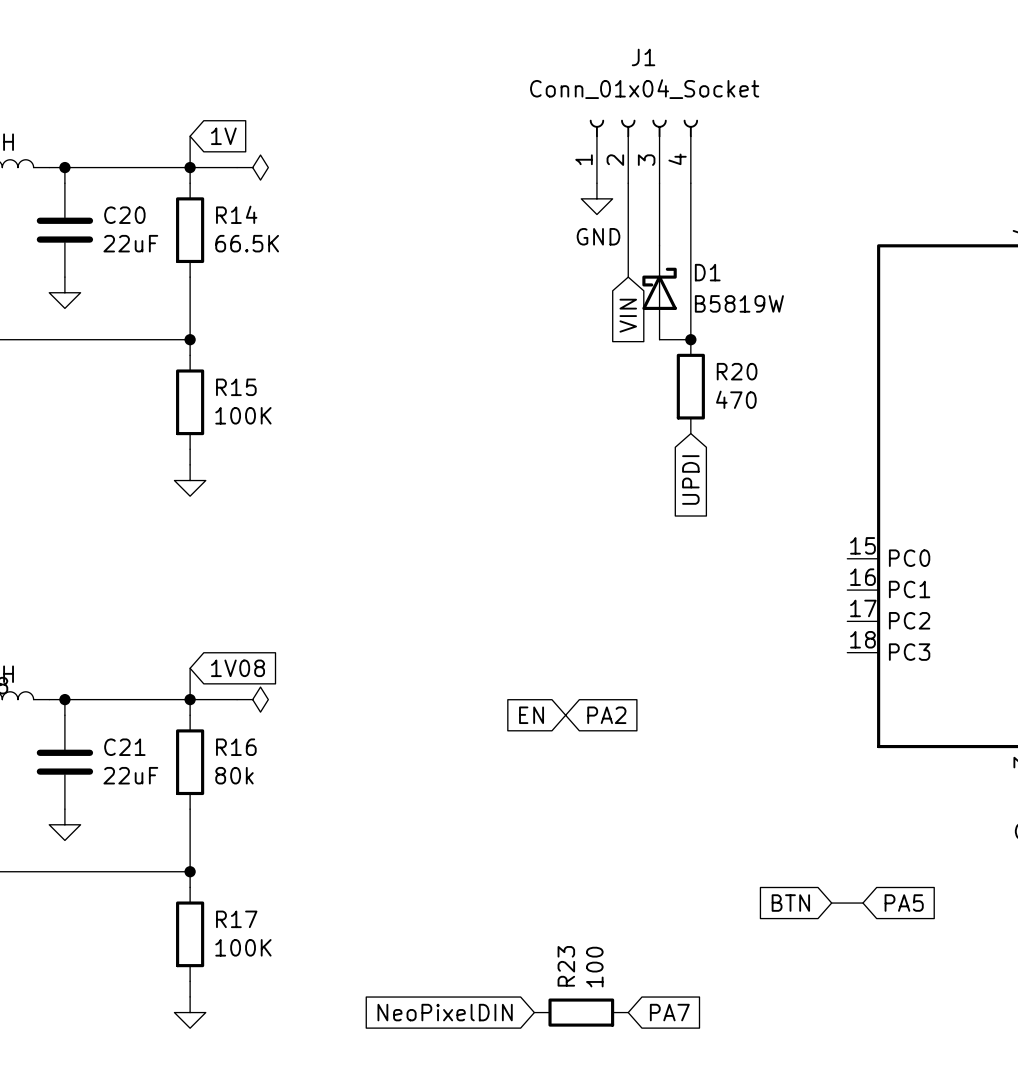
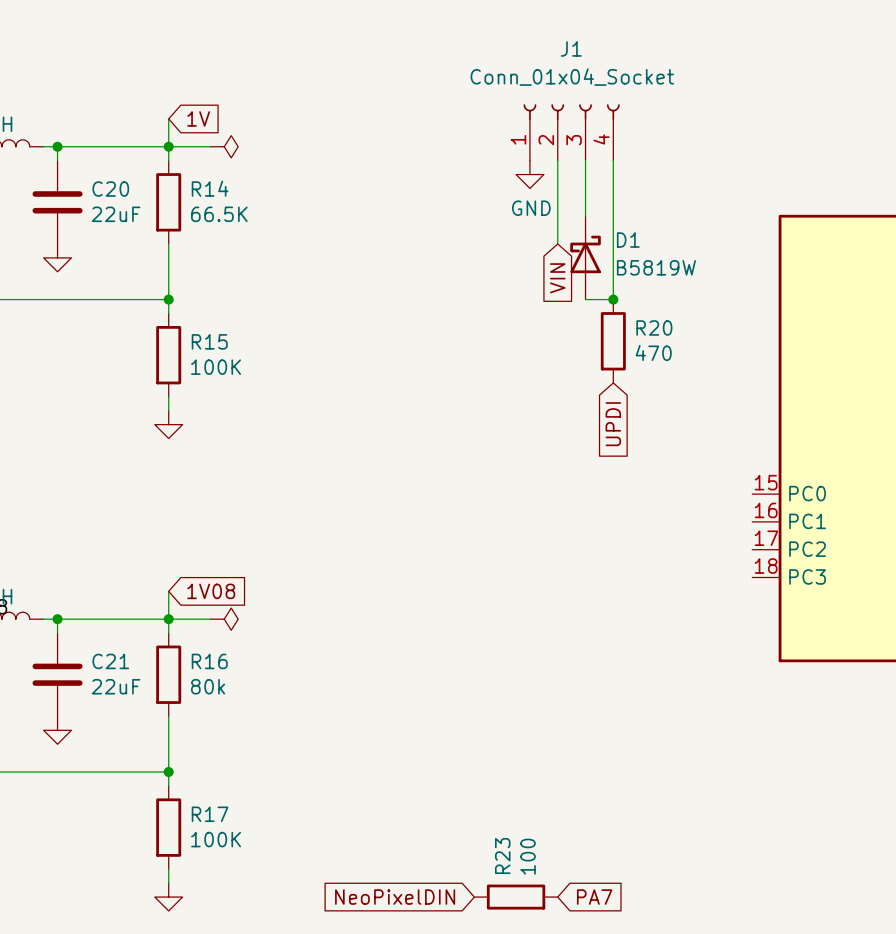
global label: EN (531, 715) -> none
global label: PA2 (606, 715) -> none
global label: BTN (790, 903) -> none
wire: (831, 903) (862, 903) -> none
global label: PA5 (904, 903) -> none

